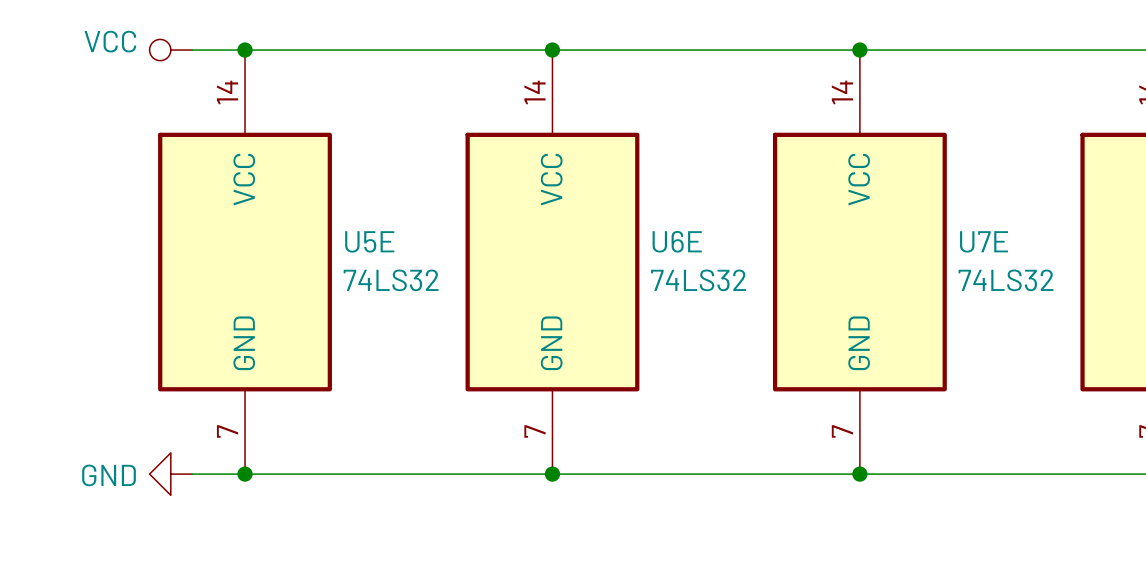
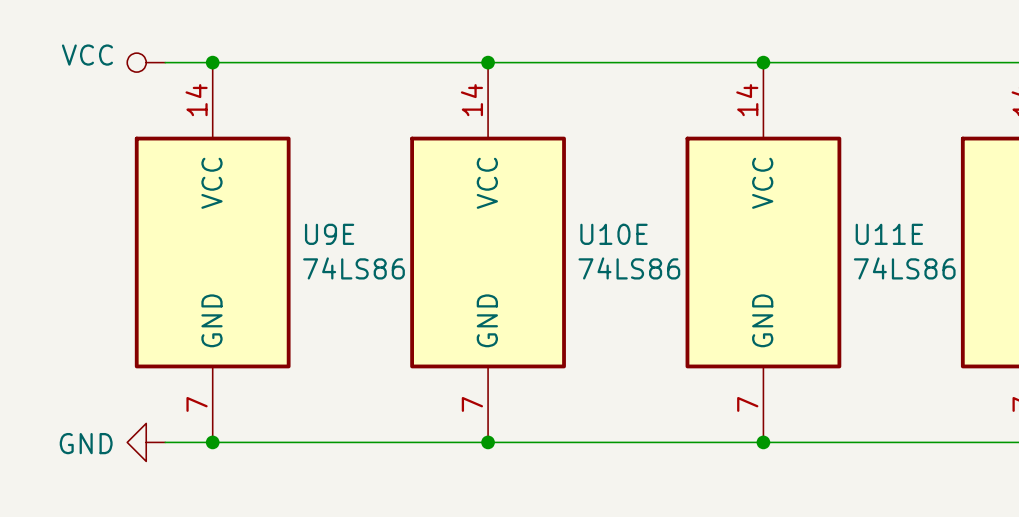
U5E name: U5E (369, 241) -> U9E (329, 234)
U6E name: U6E (677, 241) -> U10E (613, 234)
U7E name: U7E (984, 241) -> U11E (889, 234)
U5E value: 74LS32 (391, 280) -> 74LS86 (354, 268)
U6E value: 74LS32 (698, 280) -> 74LS86 (629, 268)
U7E value: 74LS32 (1005, 280) -> 74LS86 (904, 268)

